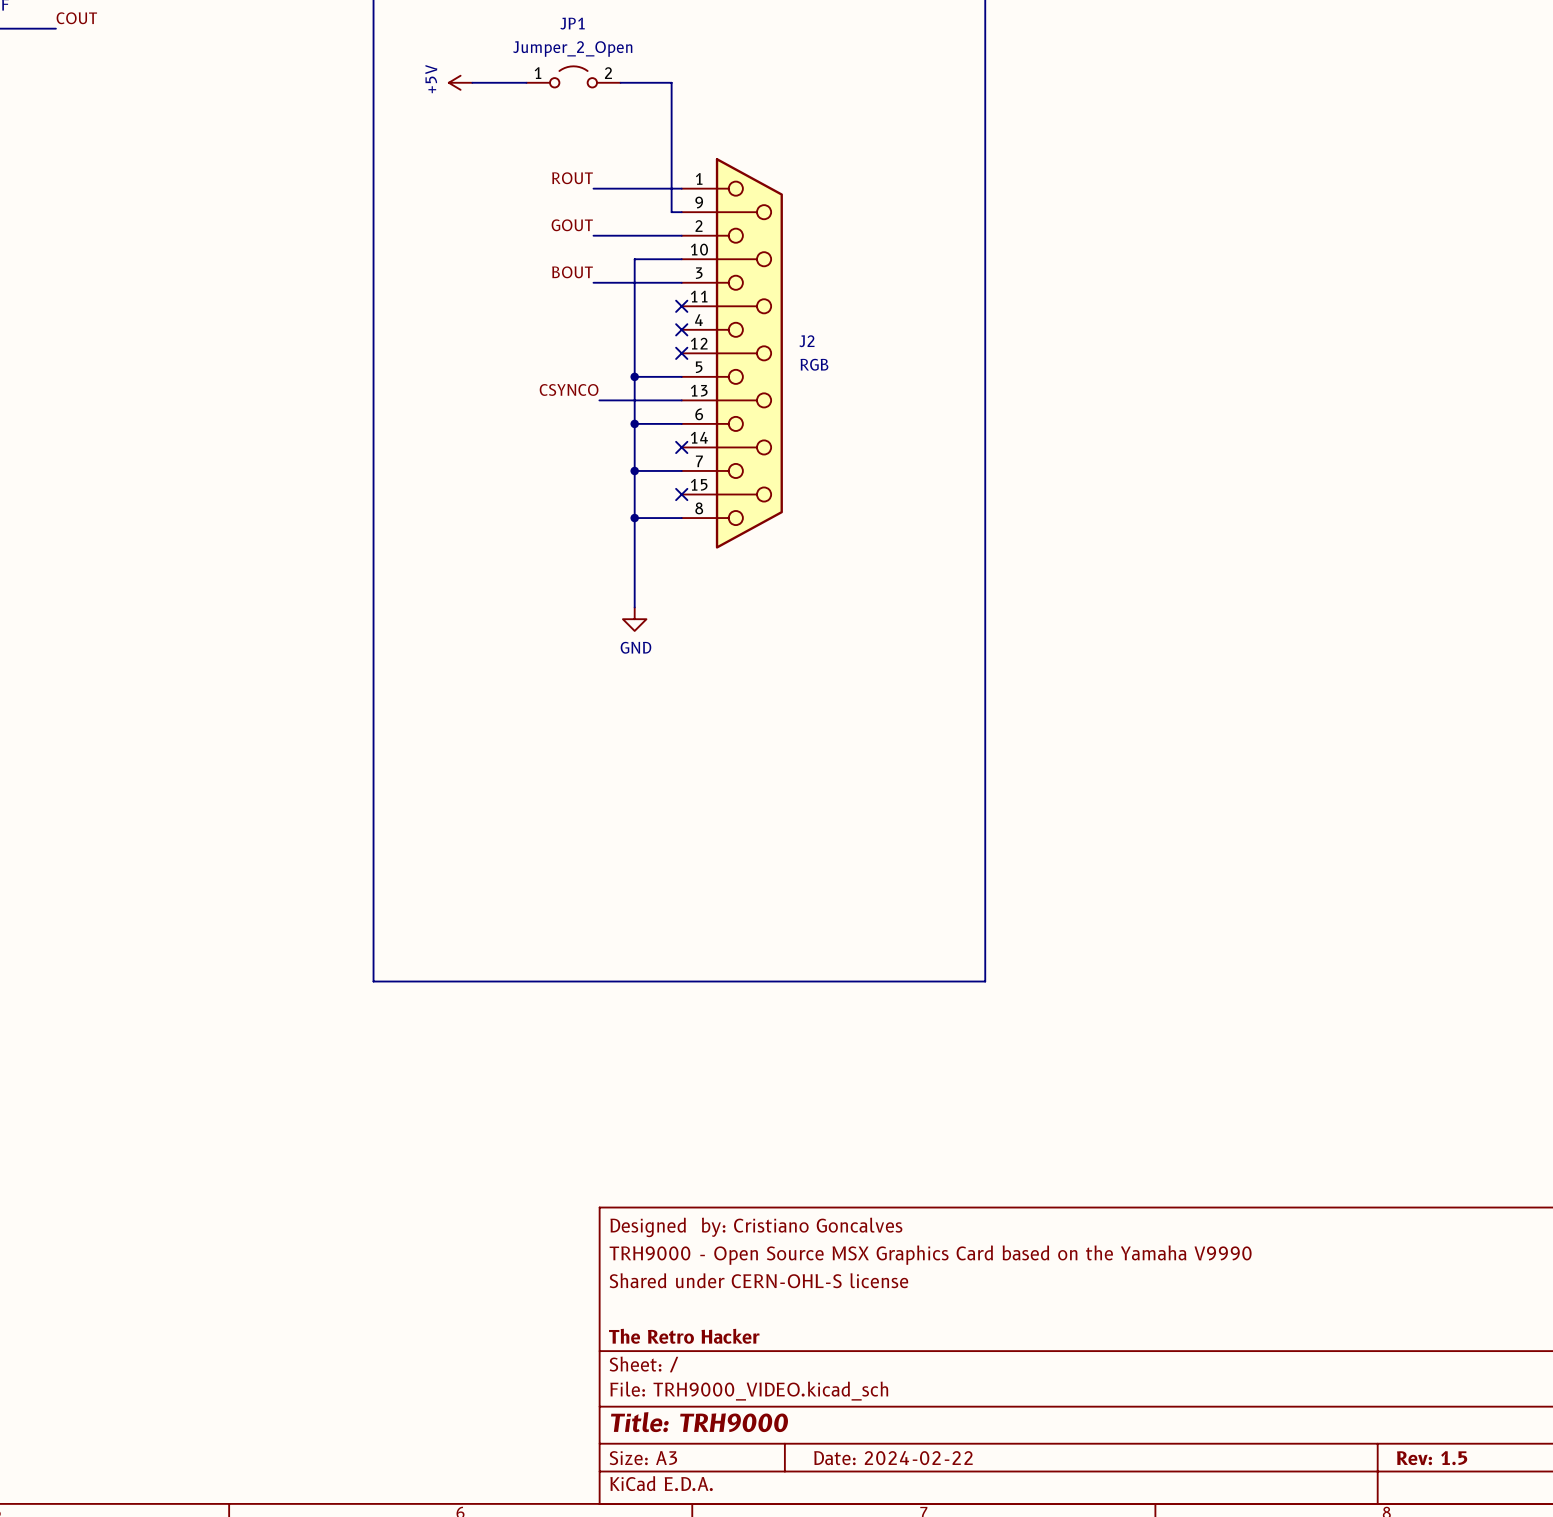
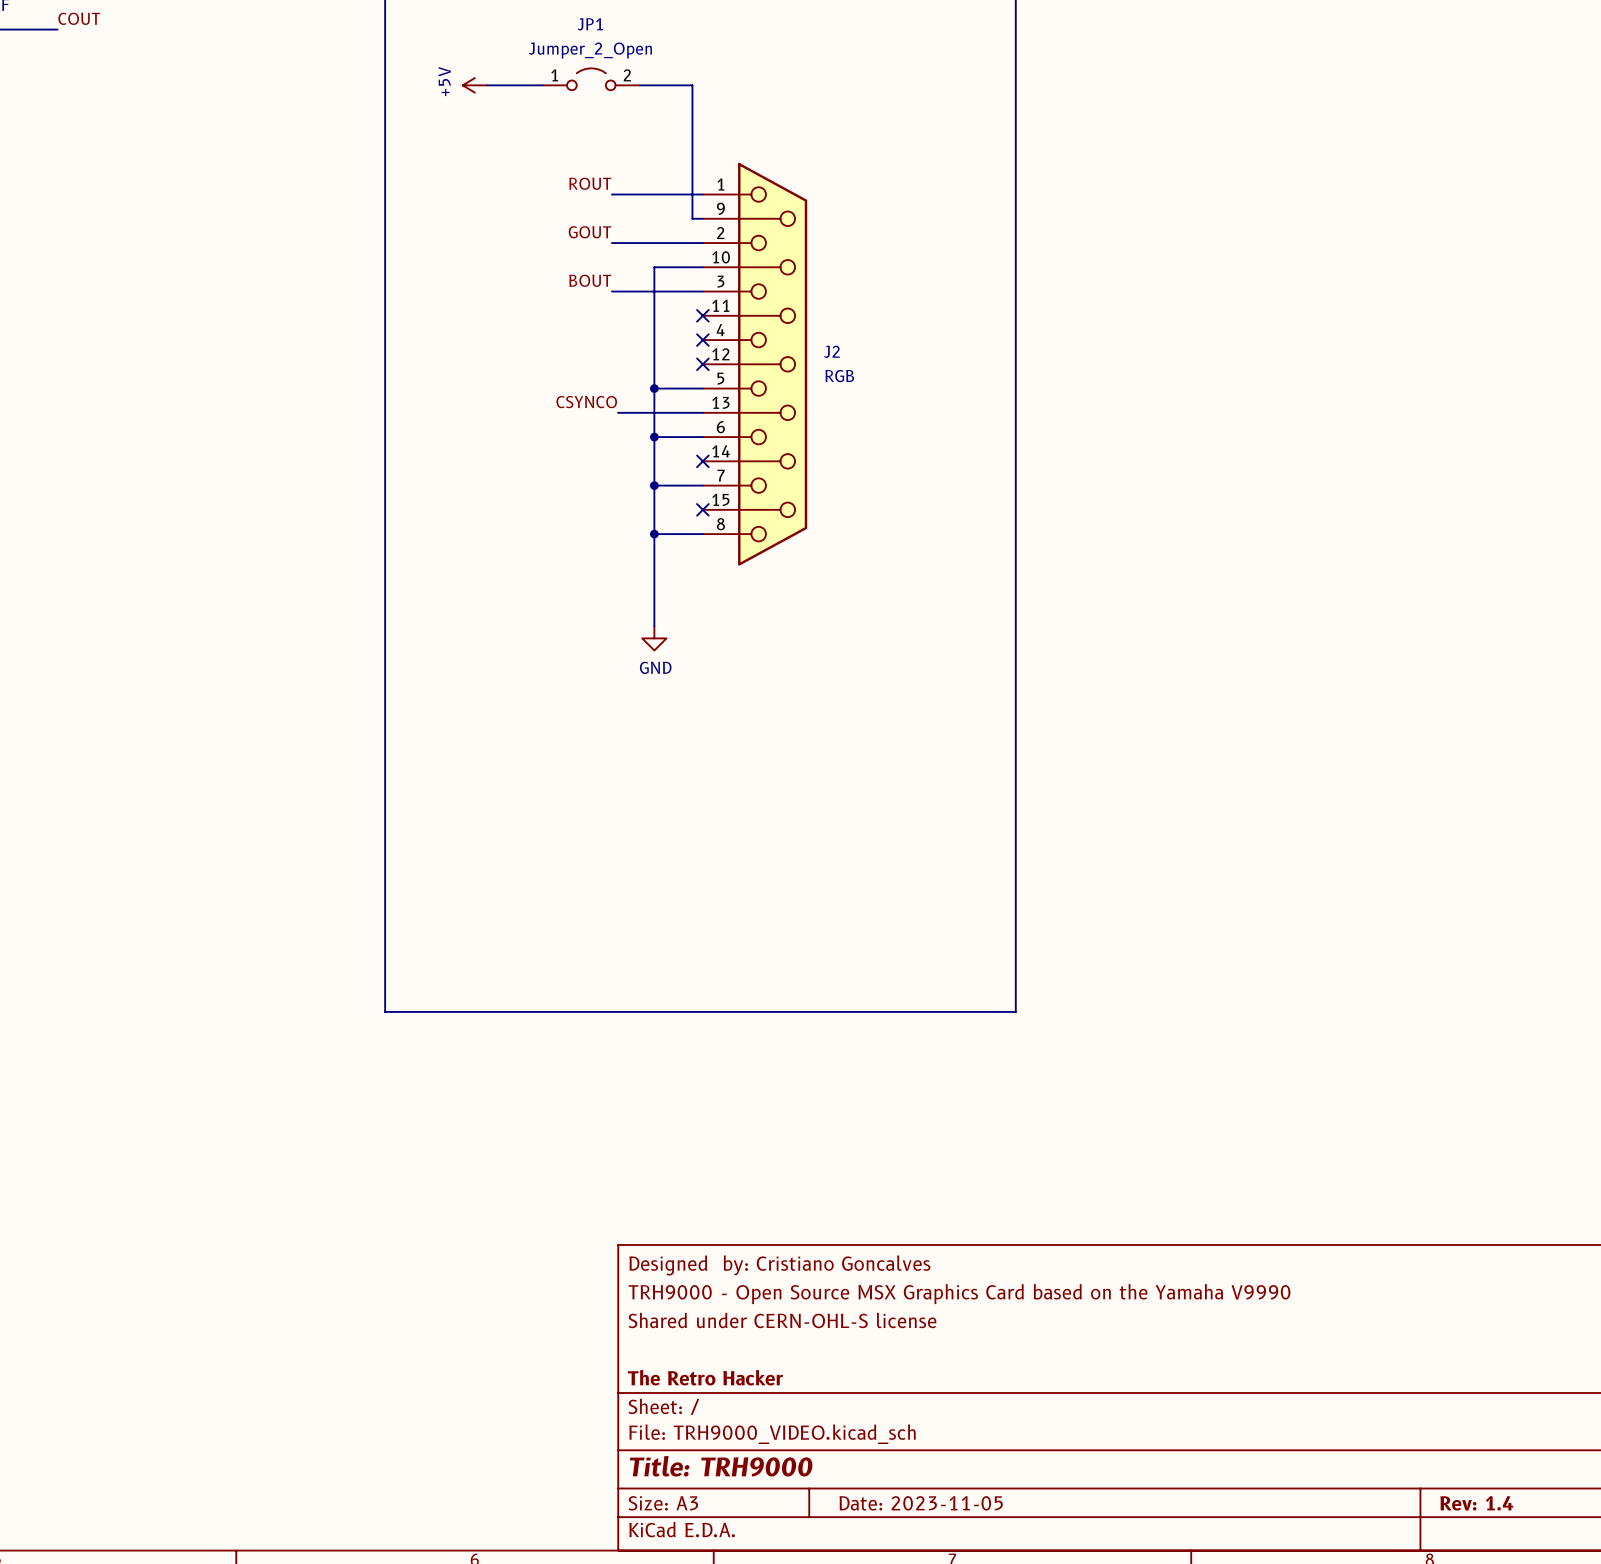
title block: Date: 2024-02-22 (893, 1458) -> Date: 2023-11-05 (921, 1503)
title block: Rev: 1.5 (1432, 1458) -> Rev: 1.4 (1476, 1503)

